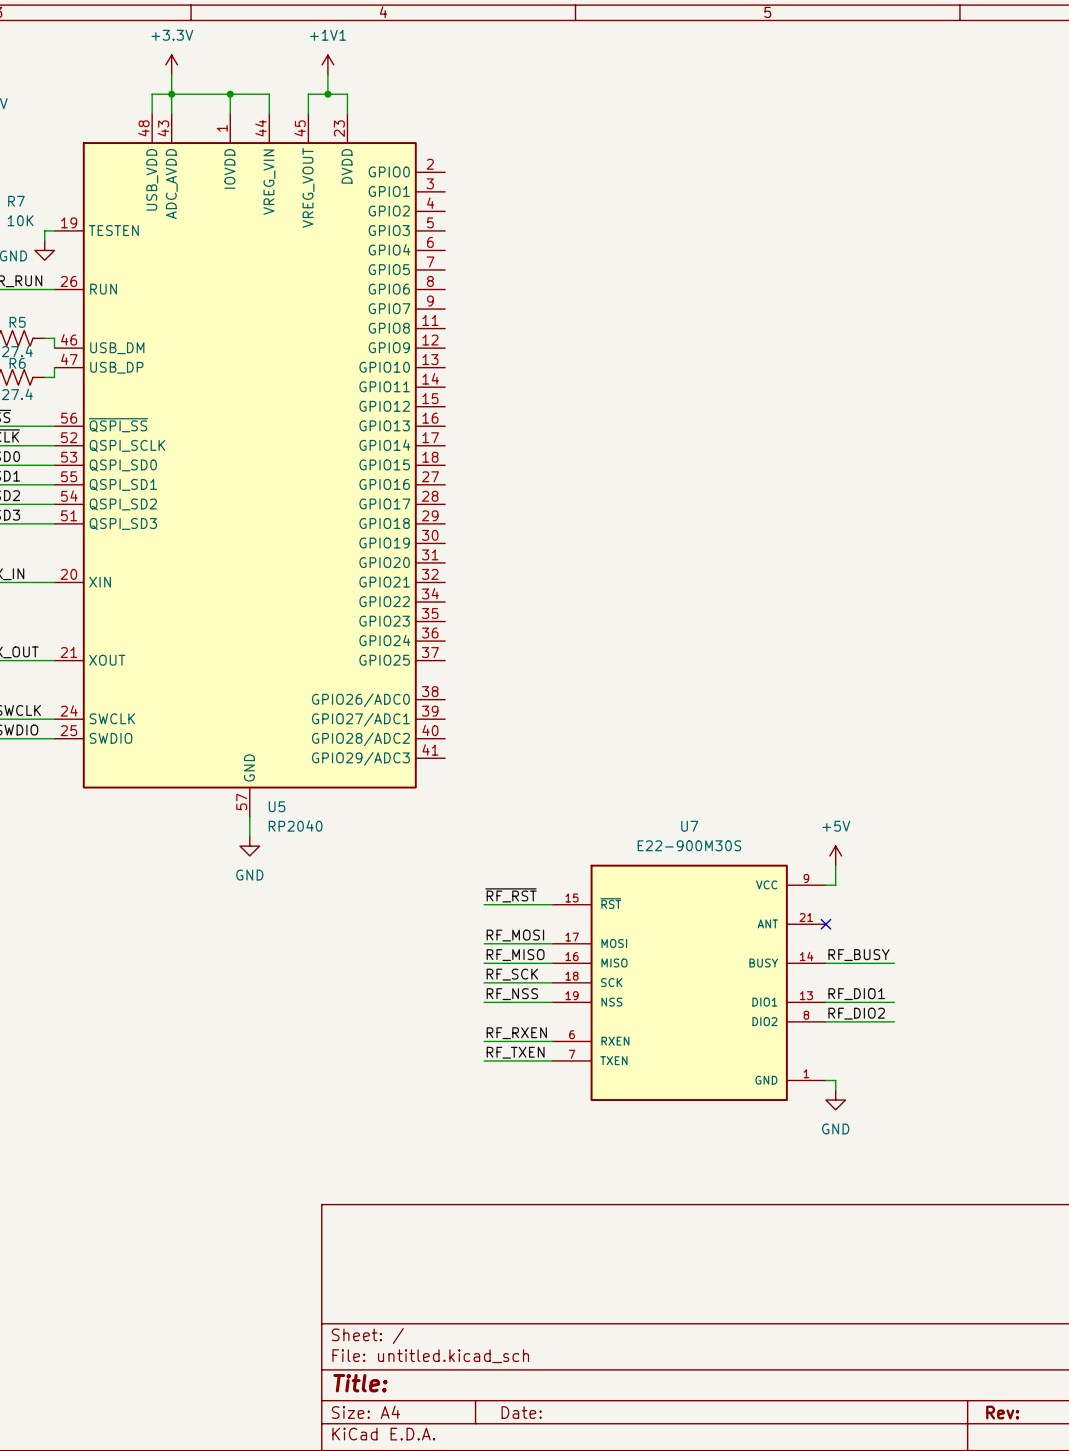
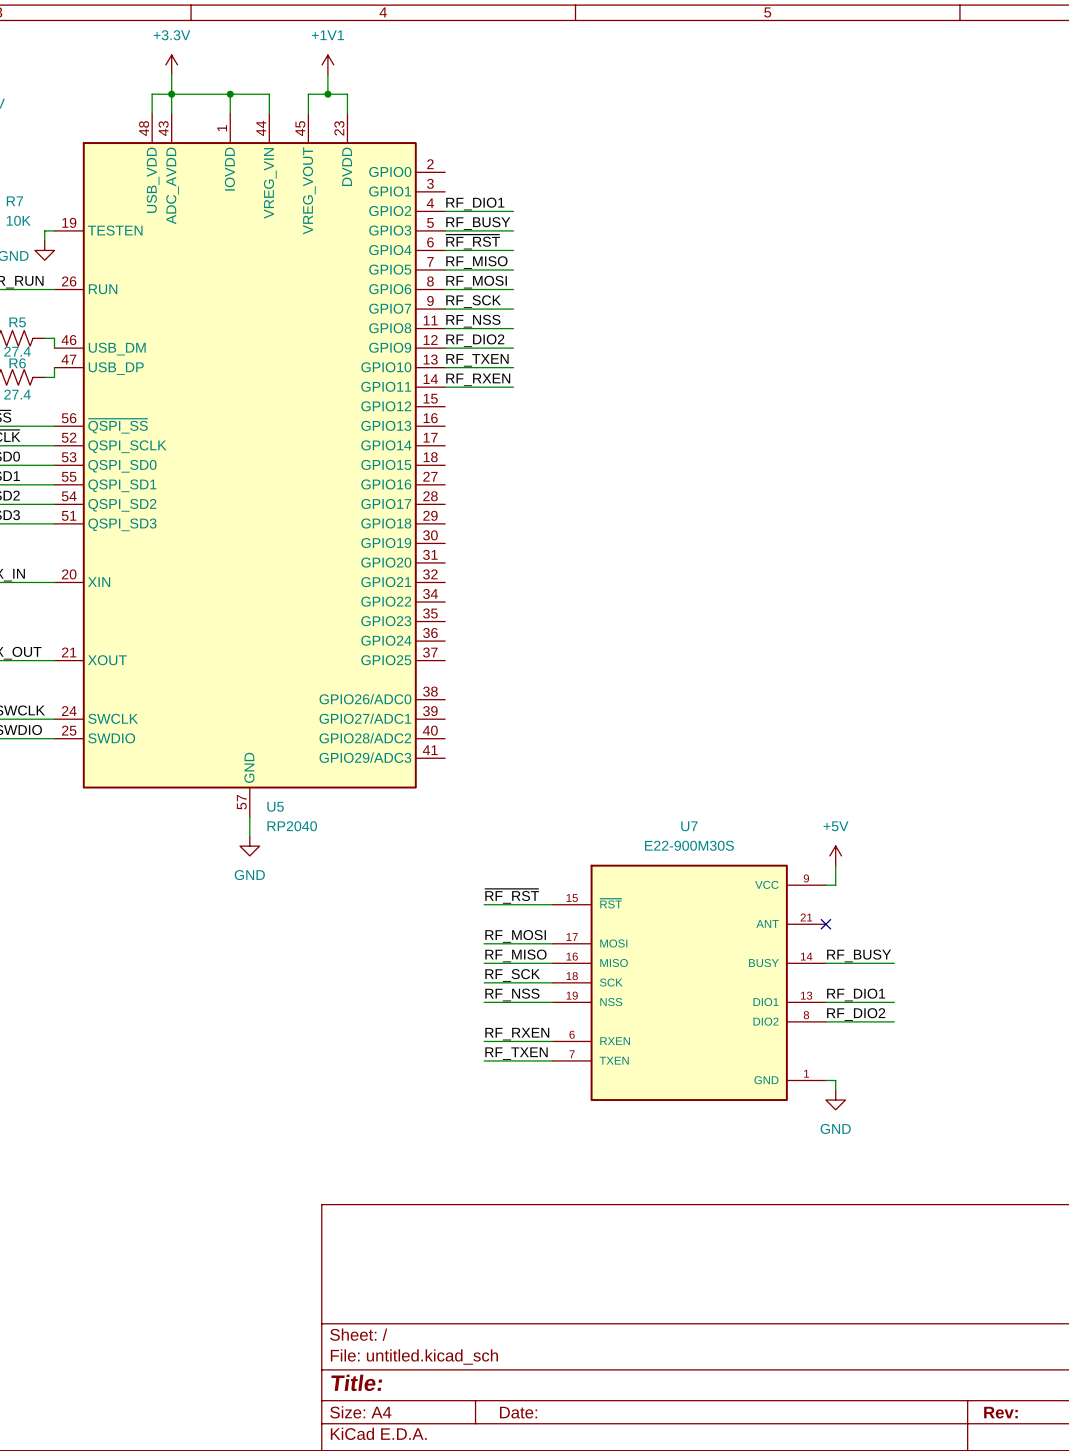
label: none -> RF_DIO1 (475, 204)
wire: none -> (445, 211) (513, 211)
label: none -> RF_BUSY (478, 223)
wire: none -> (445, 230) (513, 230)
label: none -> ~{RF_RST} (473, 242)
wire: none -> (445, 250) (513, 250)
label: none -> RF_MISO (476, 262)
wire: none -> (445, 269) (513, 269)
label: none -> RF_MOSI (476, 282)
wire: none -> (445, 289) (513, 289)
label: none -> RF_SCK (473, 301)
wire: none -> (445, 309) (513, 309)
label: none -> RF_NSS (473, 321)
wire: none -> (445, 328) (513, 328)
label: none -> RF_DIO2 (475, 340)
wire: none -> (445, 348) (513, 348)
label: none -> RF_TXEN (477, 360)
wire: none -> (445, 367) (513, 367)
label: none -> RF_RXEN (478, 379)
wire: none -> (445, 387) (513, 387)

